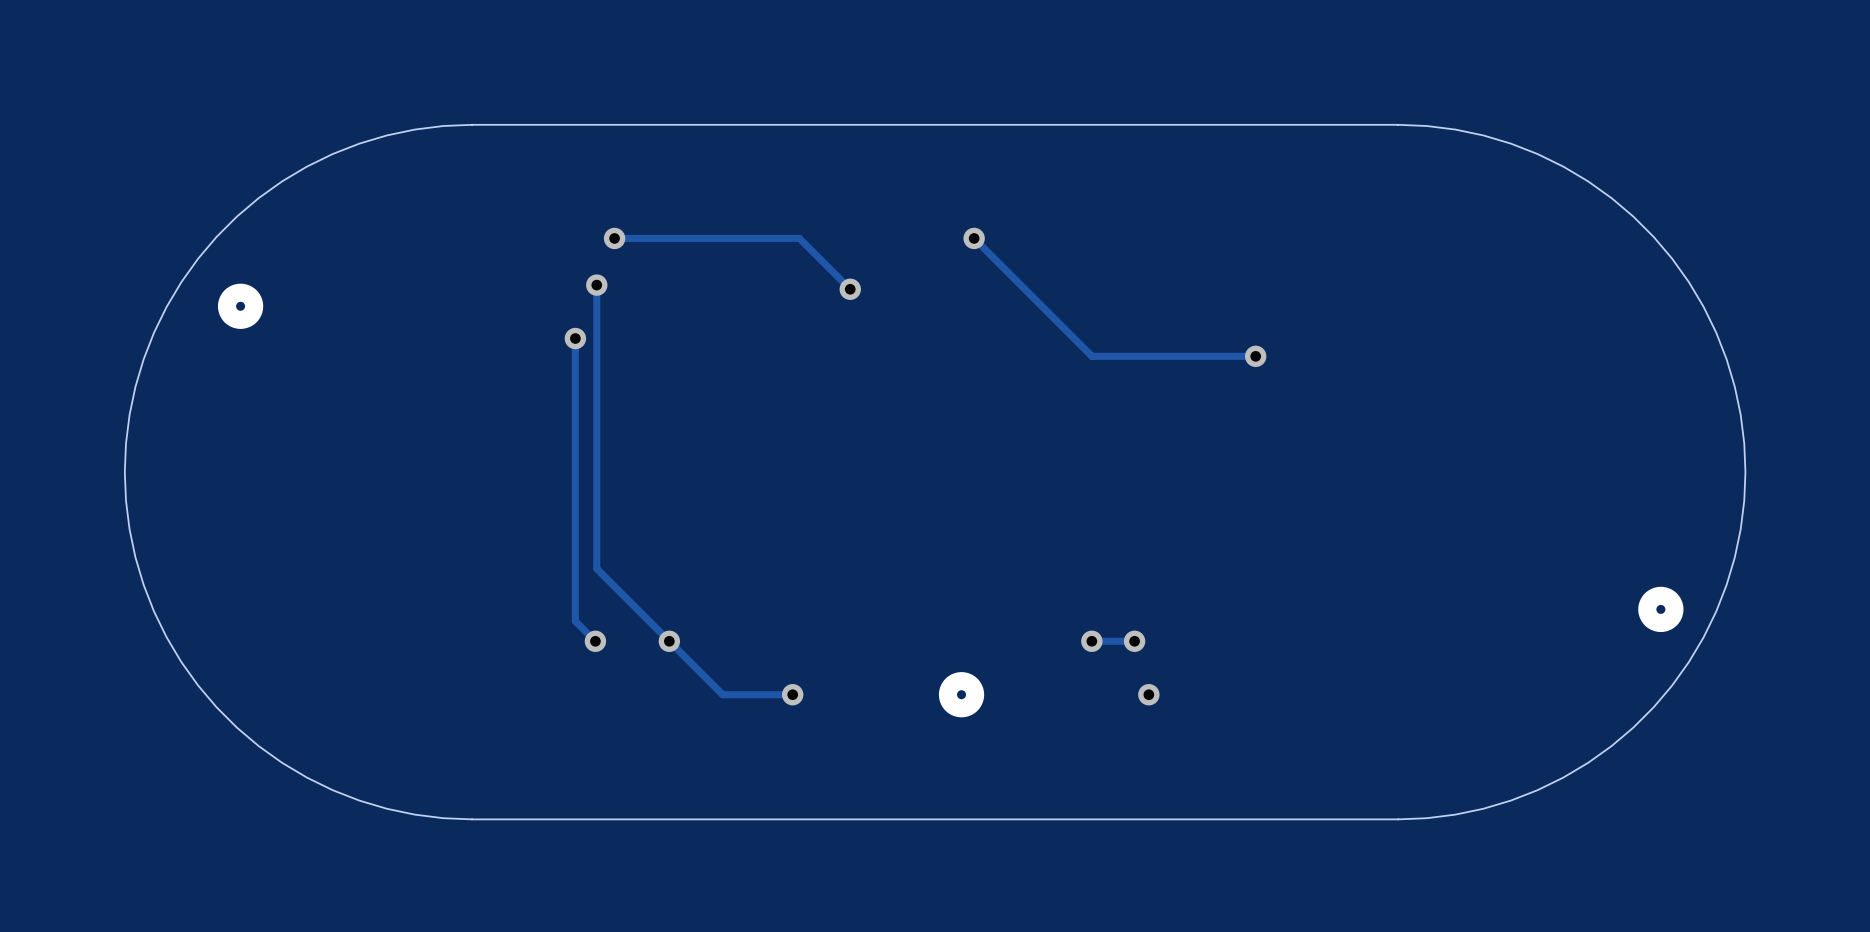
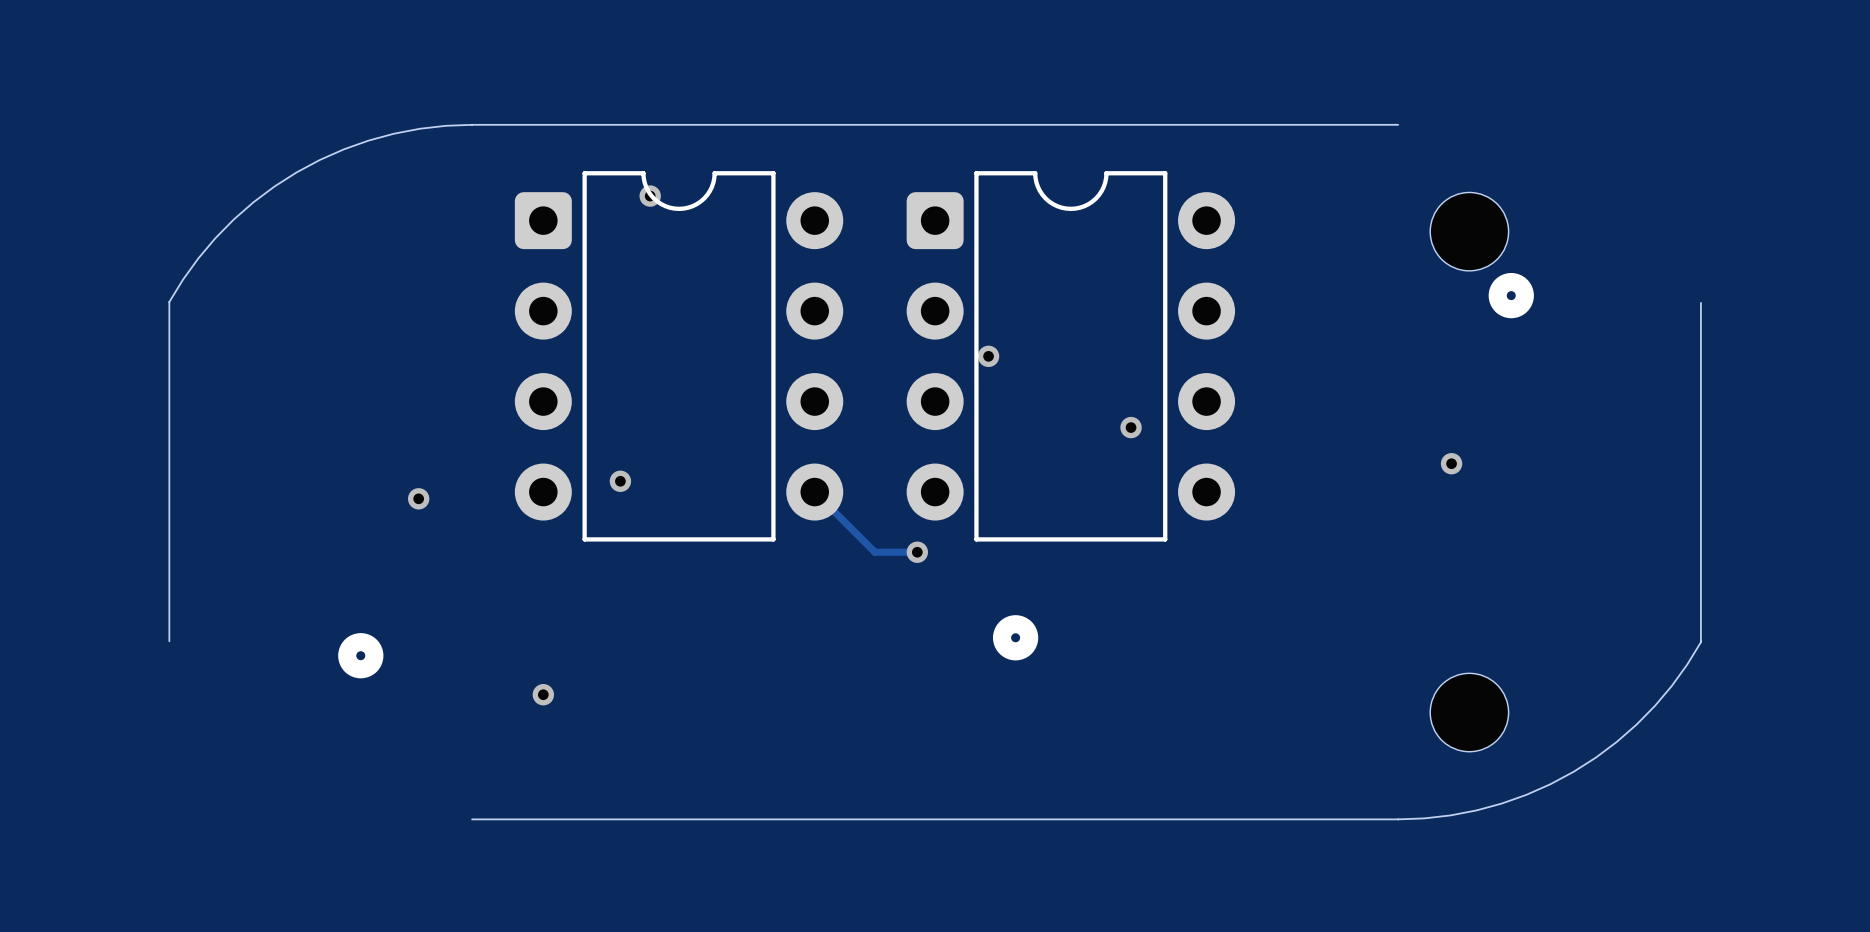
board edge: (472, 124) (443, 126) (386, 135) (332, 154) (282, 181) (236, 216) (198, 258) (166, 306) (154, 332) (143, 359) (129, 414) (124, 472) (129, 529) (143, 584) (154, 611) (166, 637) (198, 685) (236, 727) (282, 762) (332, 790) (386, 808) (443, 818) (472, 819) -> (472, 124) (419, 128) (368, 140) (319, 159) (296, 172) (274, 186) (233, 219) (198, 258) (169, 301) (169, 641)
board edge: (1398, 124) (1426, 126) (1483, 135) (1537, 154) (1588, 181) (1611, 198) (1653, 236) (1688, 282) (1716, 332) (1726, 359) (1740, 414) (1745, 472) (1744, 500) (1734, 557) (1716, 611) (1688, 662) (1672, 685) (1633, 727) (1588, 762) (1537, 790) (1510, 800) (1455, 814) (1398, 819) -> (1700, 302) (1700, 642) (1671, 685) (1636, 724) (1595, 757) (1573, 771) (1526, 794) (1476, 810) (1424, 818) (1398, 819)
via: none -> (650, 196)
part: none -> (1469, 231)
track: (614, 238) (799, 238) (850, 289) -> none
via: (614, 238) -> none
track: (974, 238) (1092, 356) (1255, 356) -> none
via: (974, 238) -> none
track: (596, 285) (596, 568) (722, 694) (792, 694) -> none
via: (596, 285) -> none
via: (850, 289) -> none
part: none -> (1511, 295)
part: (240, 306) -> none
track: (575, 338) (575, 621) (595, 641) -> none
via: (575, 338) -> none
part: none -> (679, 356)
via: none -> (988, 356)
part: none -> (1070, 356)
via: (1255, 356) -> none
via: none -> (1131, 427)
via: none -> (1451, 463)
via: none -> (620, 481)
track: none -> (814, 492) (874, 552) (917, 552)
via: none -> (418, 498)
via: none -> (917, 552)
part: (1660, 609) -> none
via: (595, 641) -> none
via: (669, 641) -> none
via: (1091, 641) -> none
track: (1134, 641) (1091, 641) -> none
via: (1134, 641) -> none
part: none -> (360, 655)
via: none -> (543, 694)
via: (792, 694) -> none
part position: (961, 694) -> (1015, 637)
via: (1148, 694) -> none
part: none -> (1469, 712)

